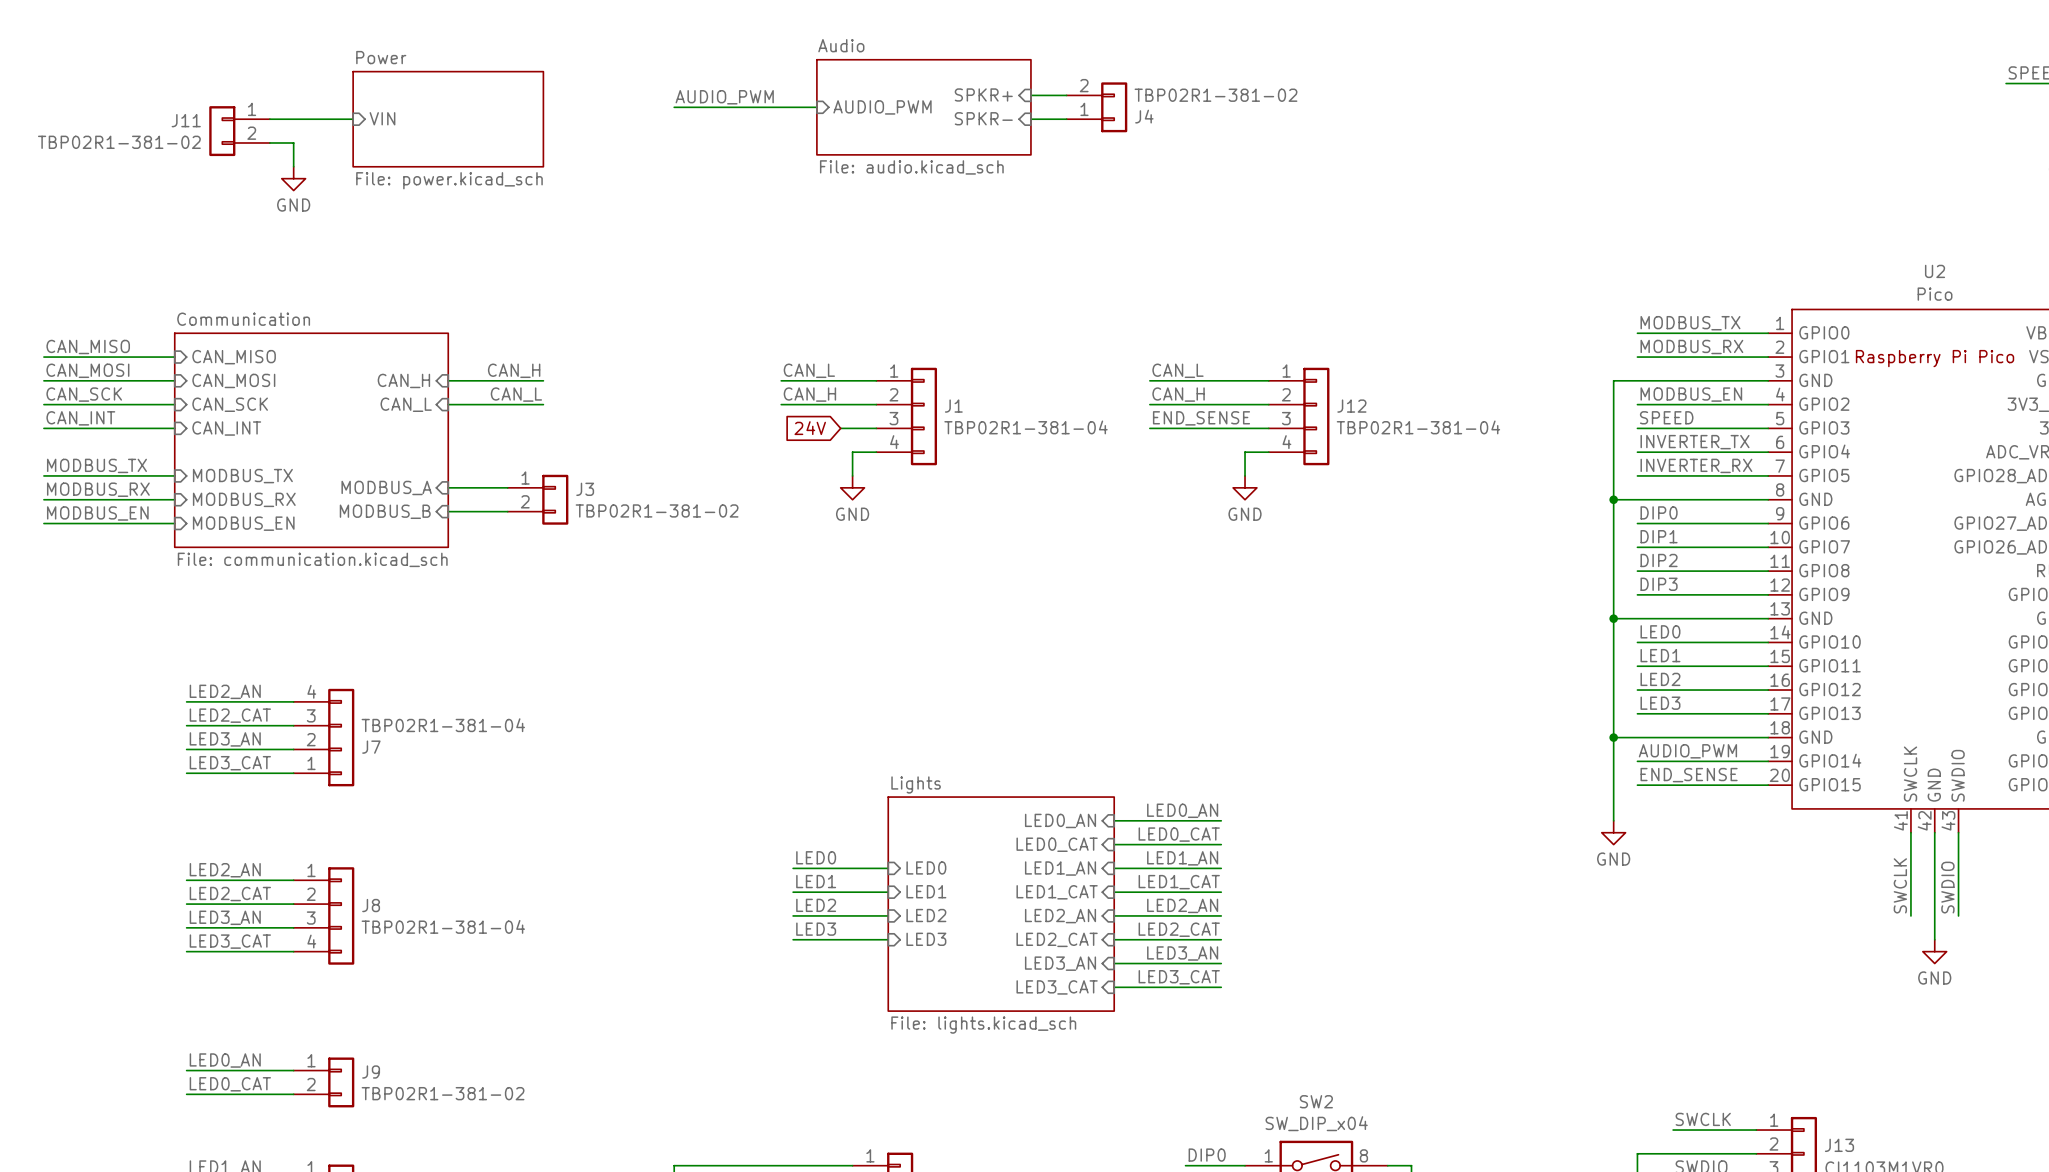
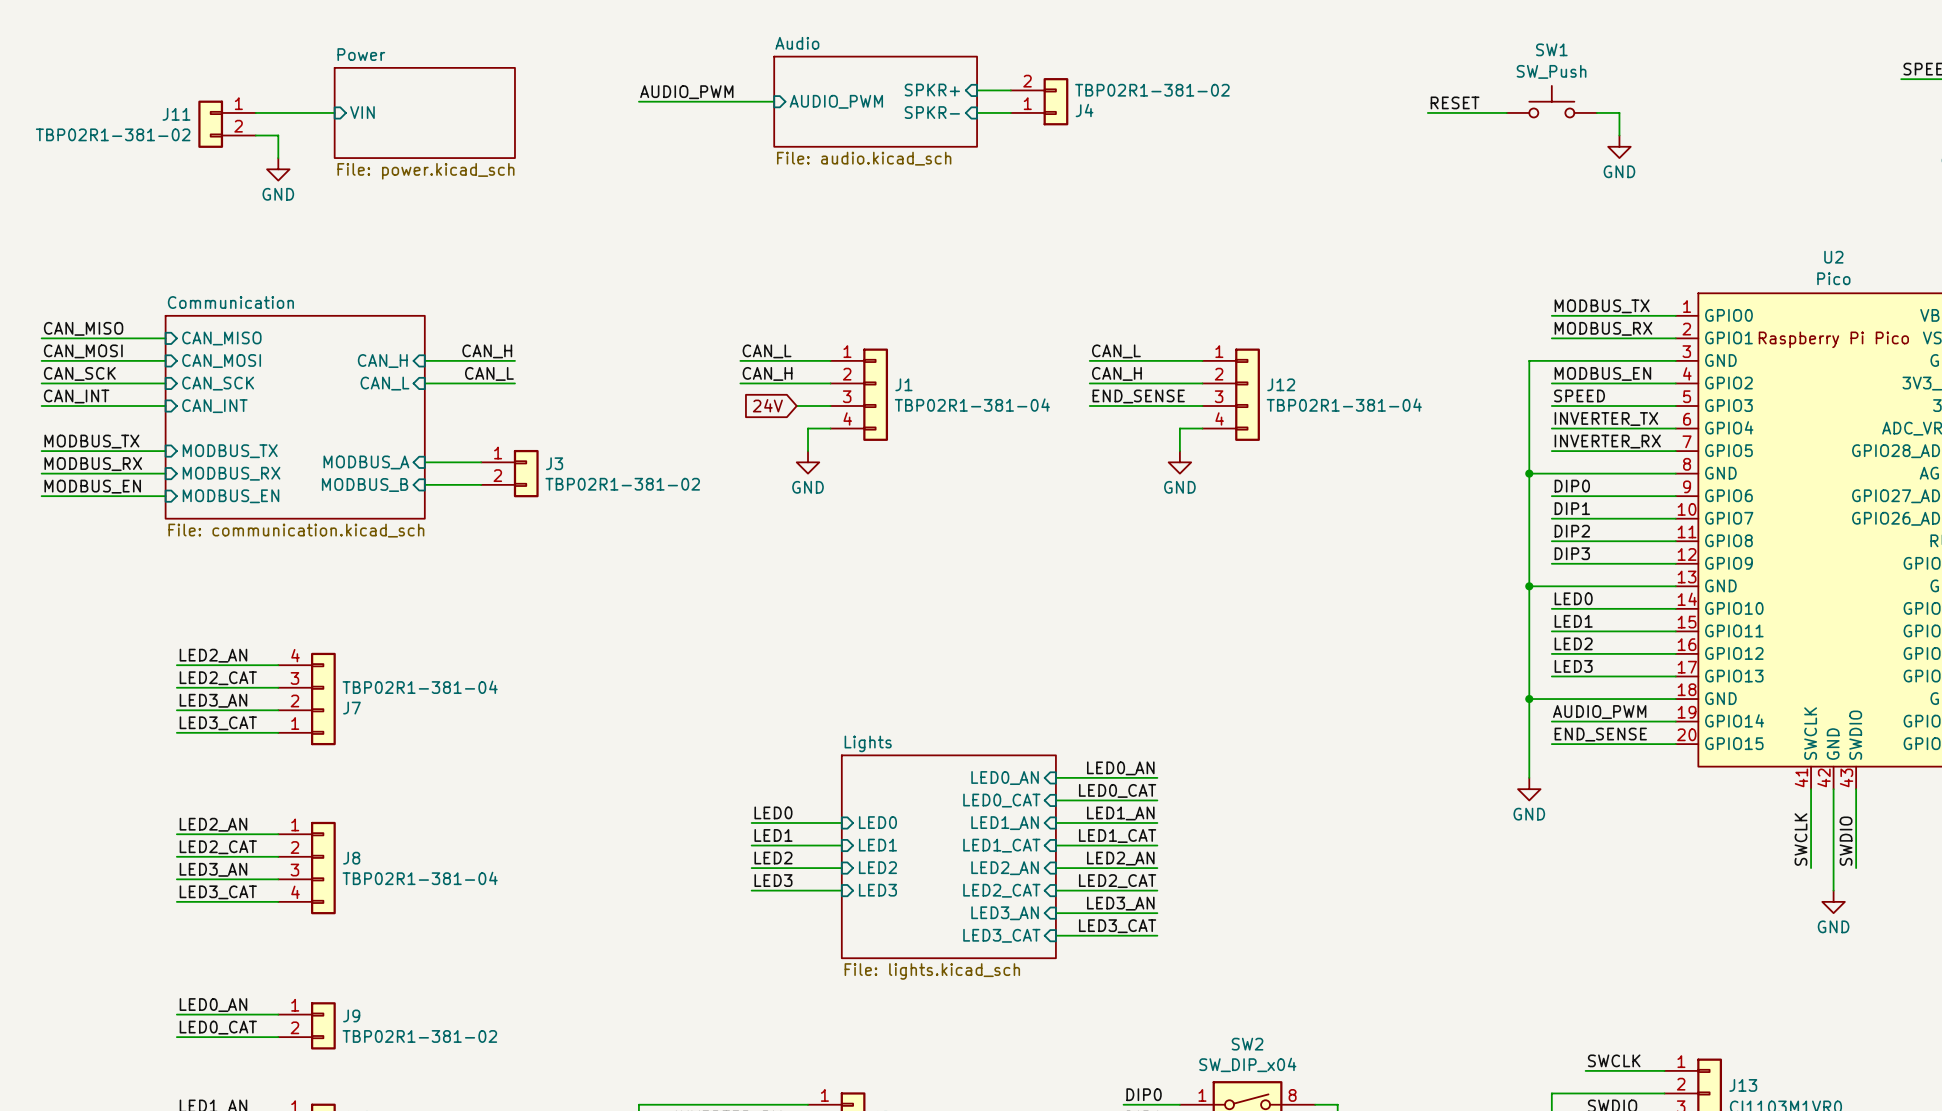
SW1: none -> SW_Push (1551, 101)
label: none -> RESET (1455, 102)
wire: none -> (1427, 112) (1506, 112)
wire: none -> (1596, 112) (1619, 112) (1619, 135)
power symbol: none -> GND (1619, 146)

